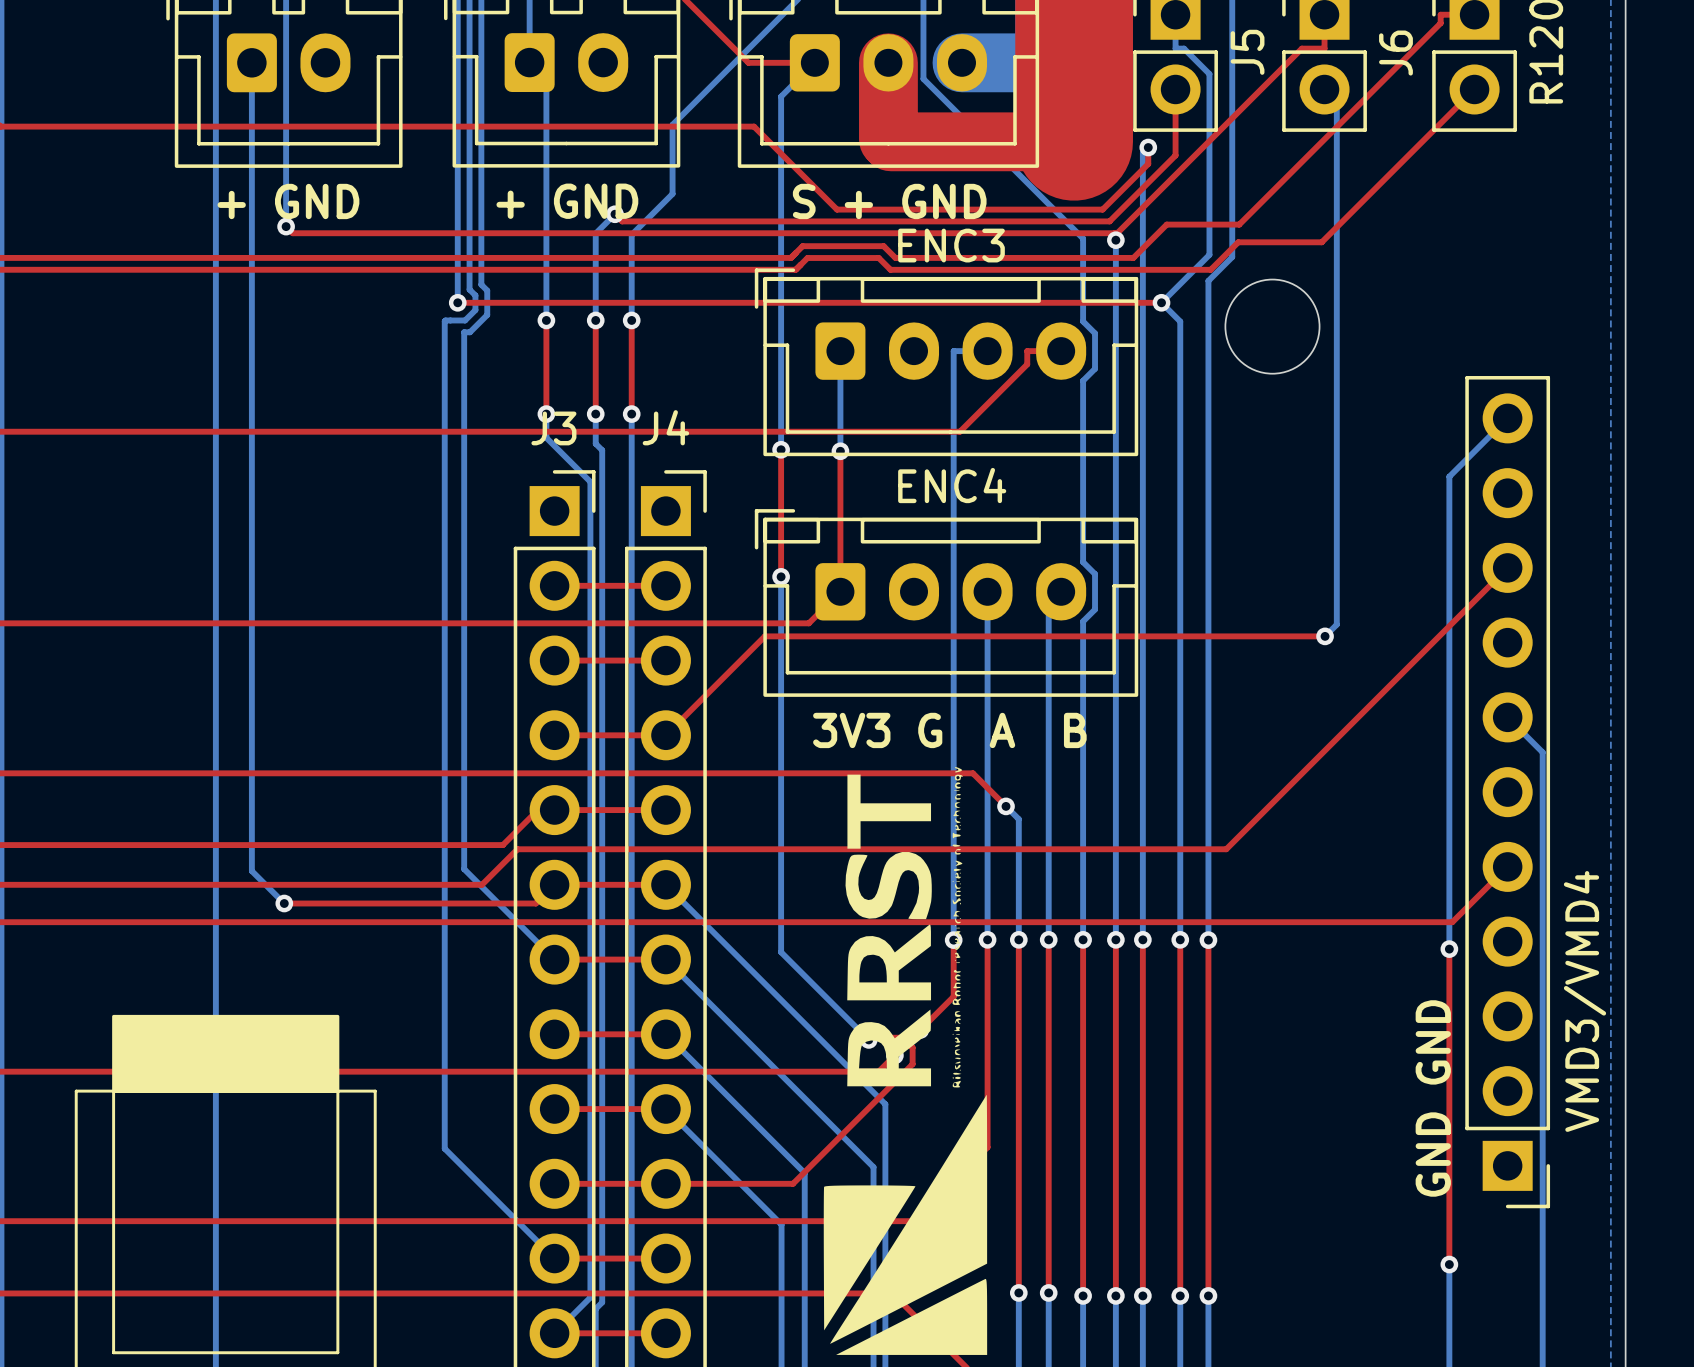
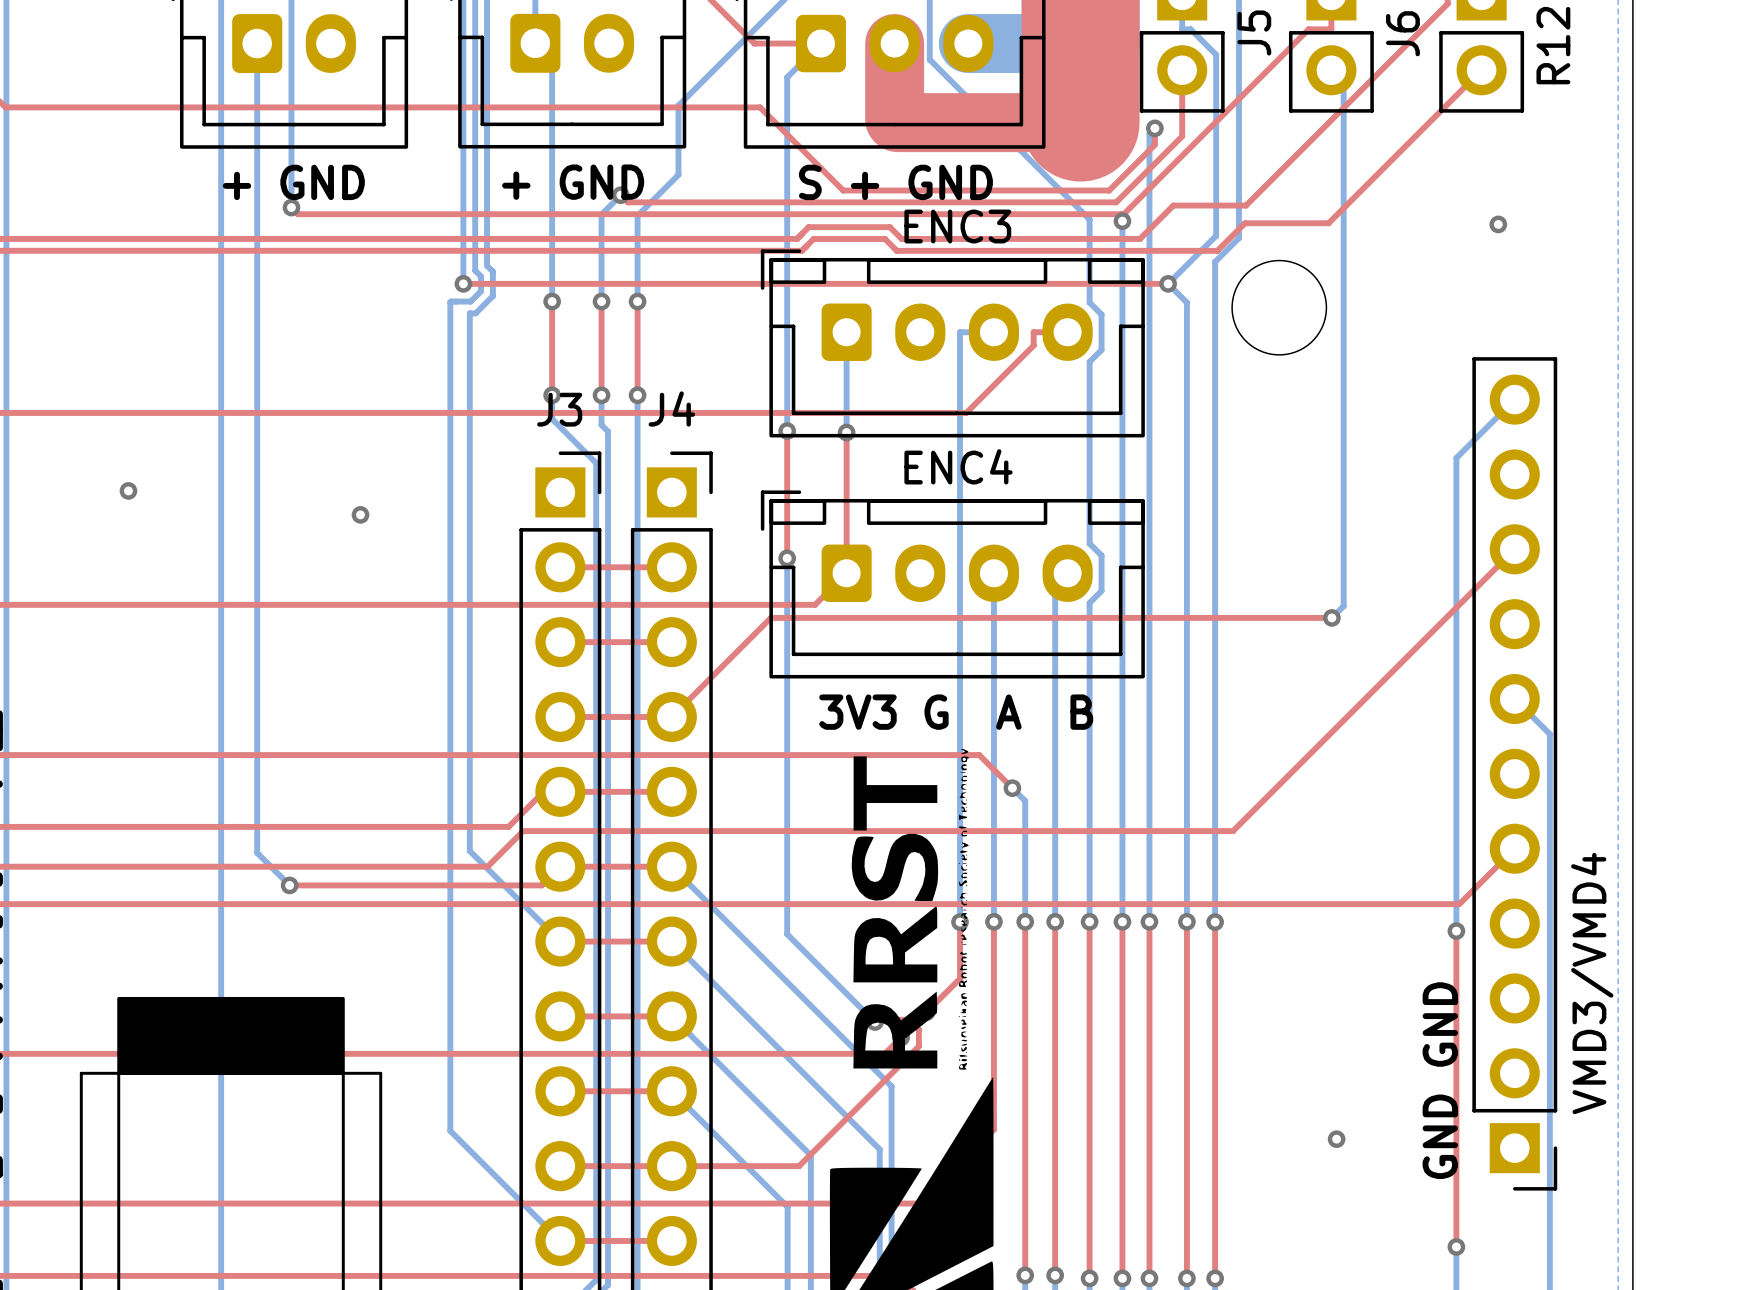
via: none -> (1498, 224)
via: none -> (128, 490)
via: none -> (360, 514)
via: none -> (1336, 1139)

